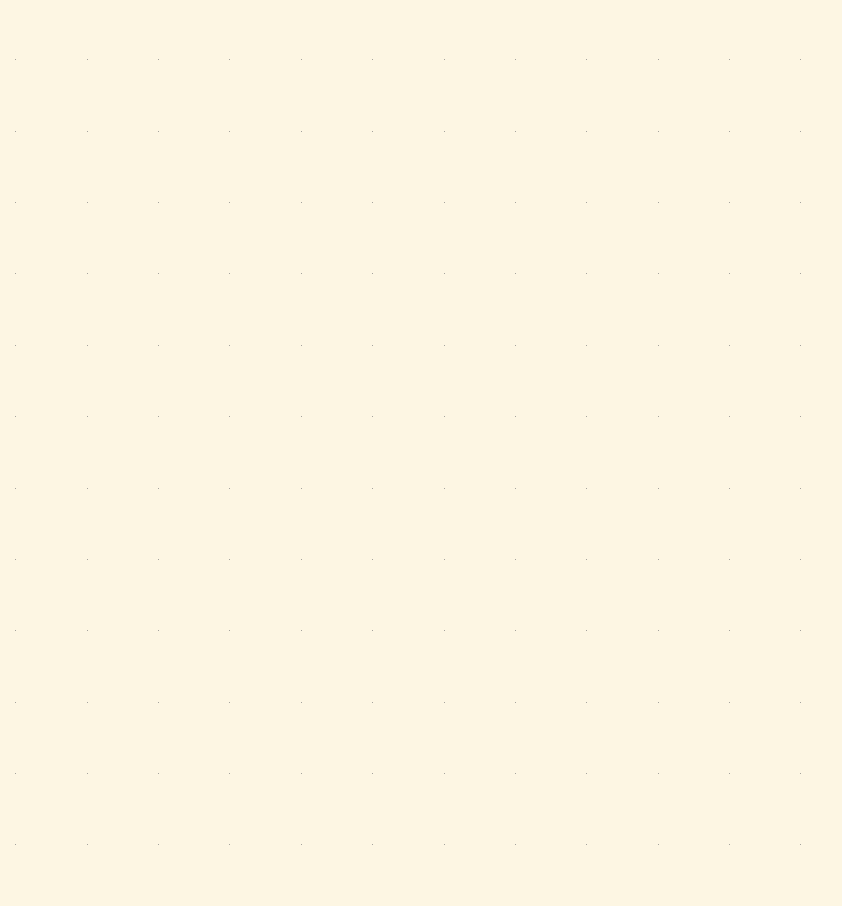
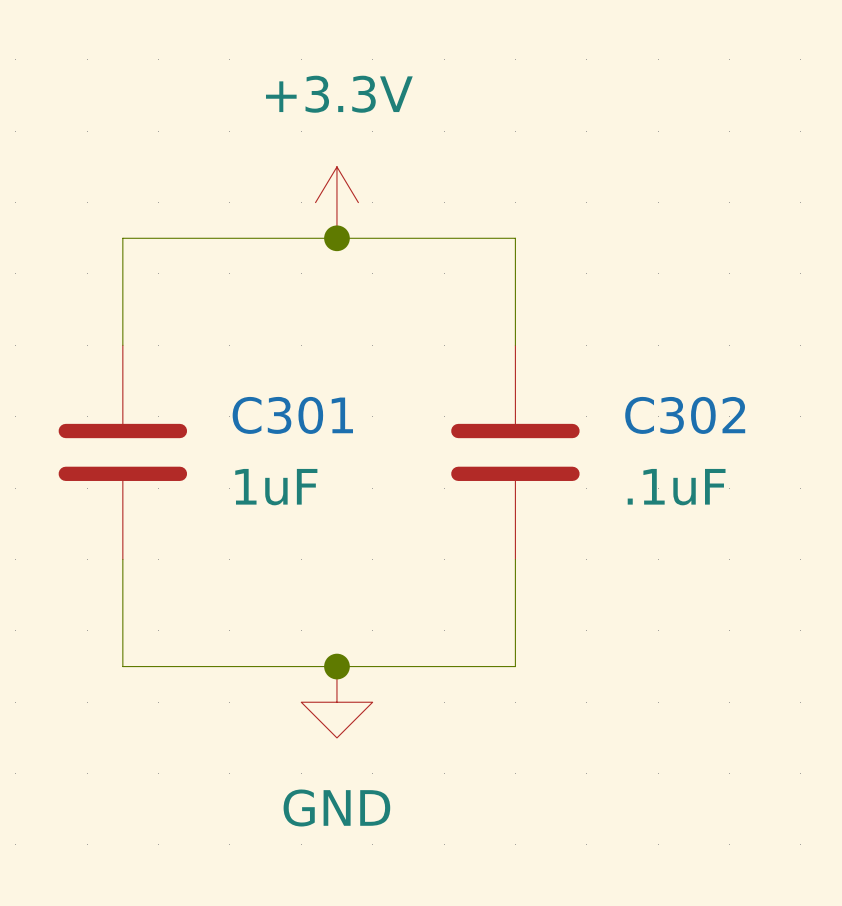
power symbol: none -> +3.3V (336, 202)
junction: none -> (336, 238)
wire: none -> (122, 345) (122, 238) (515, 238) (515, 345)
C301: none -> 1uF (122, 452)
C302: none -> .1uF (515, 452)
wire: none -> (122, 559) (122, 666) (515, 666) (515, 559)
junction: none -> (336, 666)
power symbol: none -> GND (336, 702)

